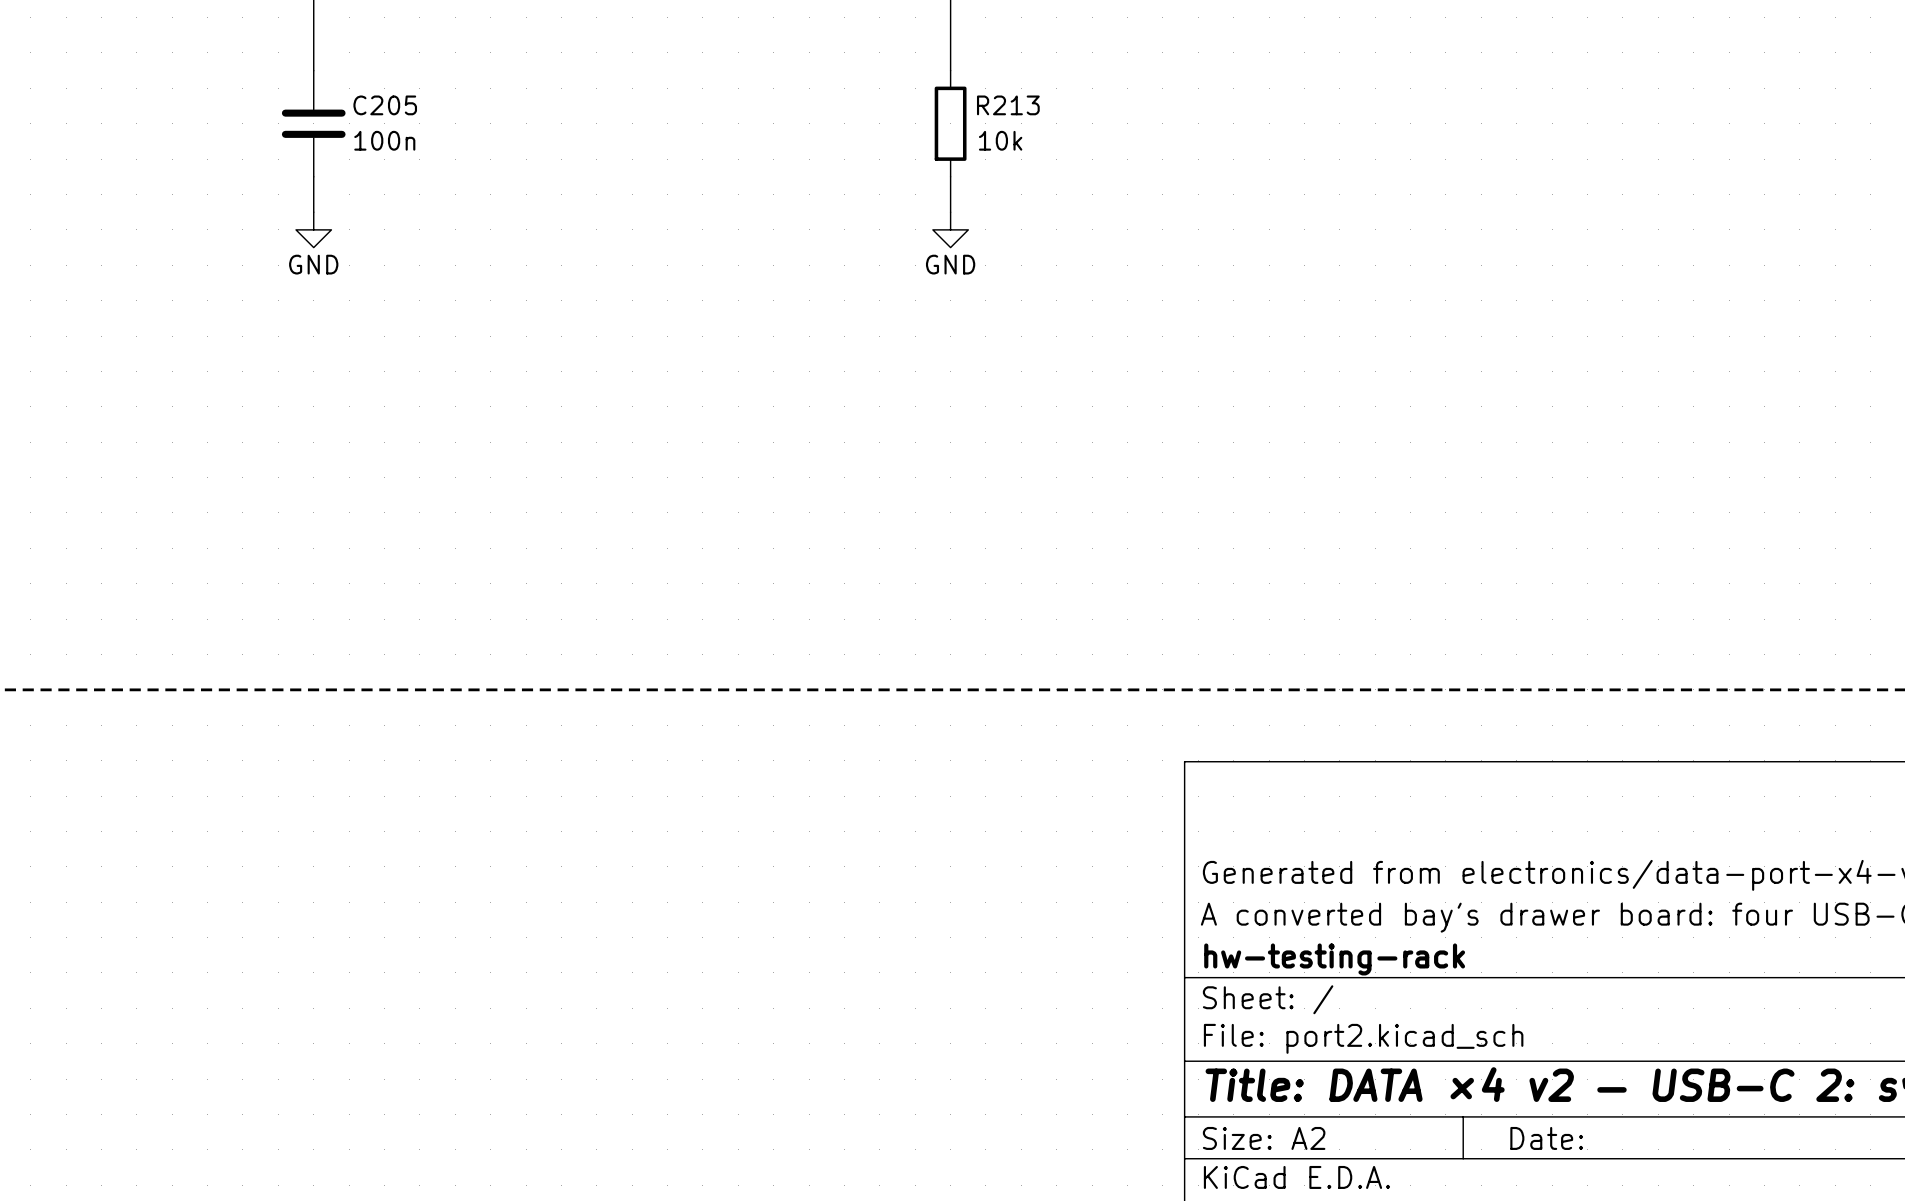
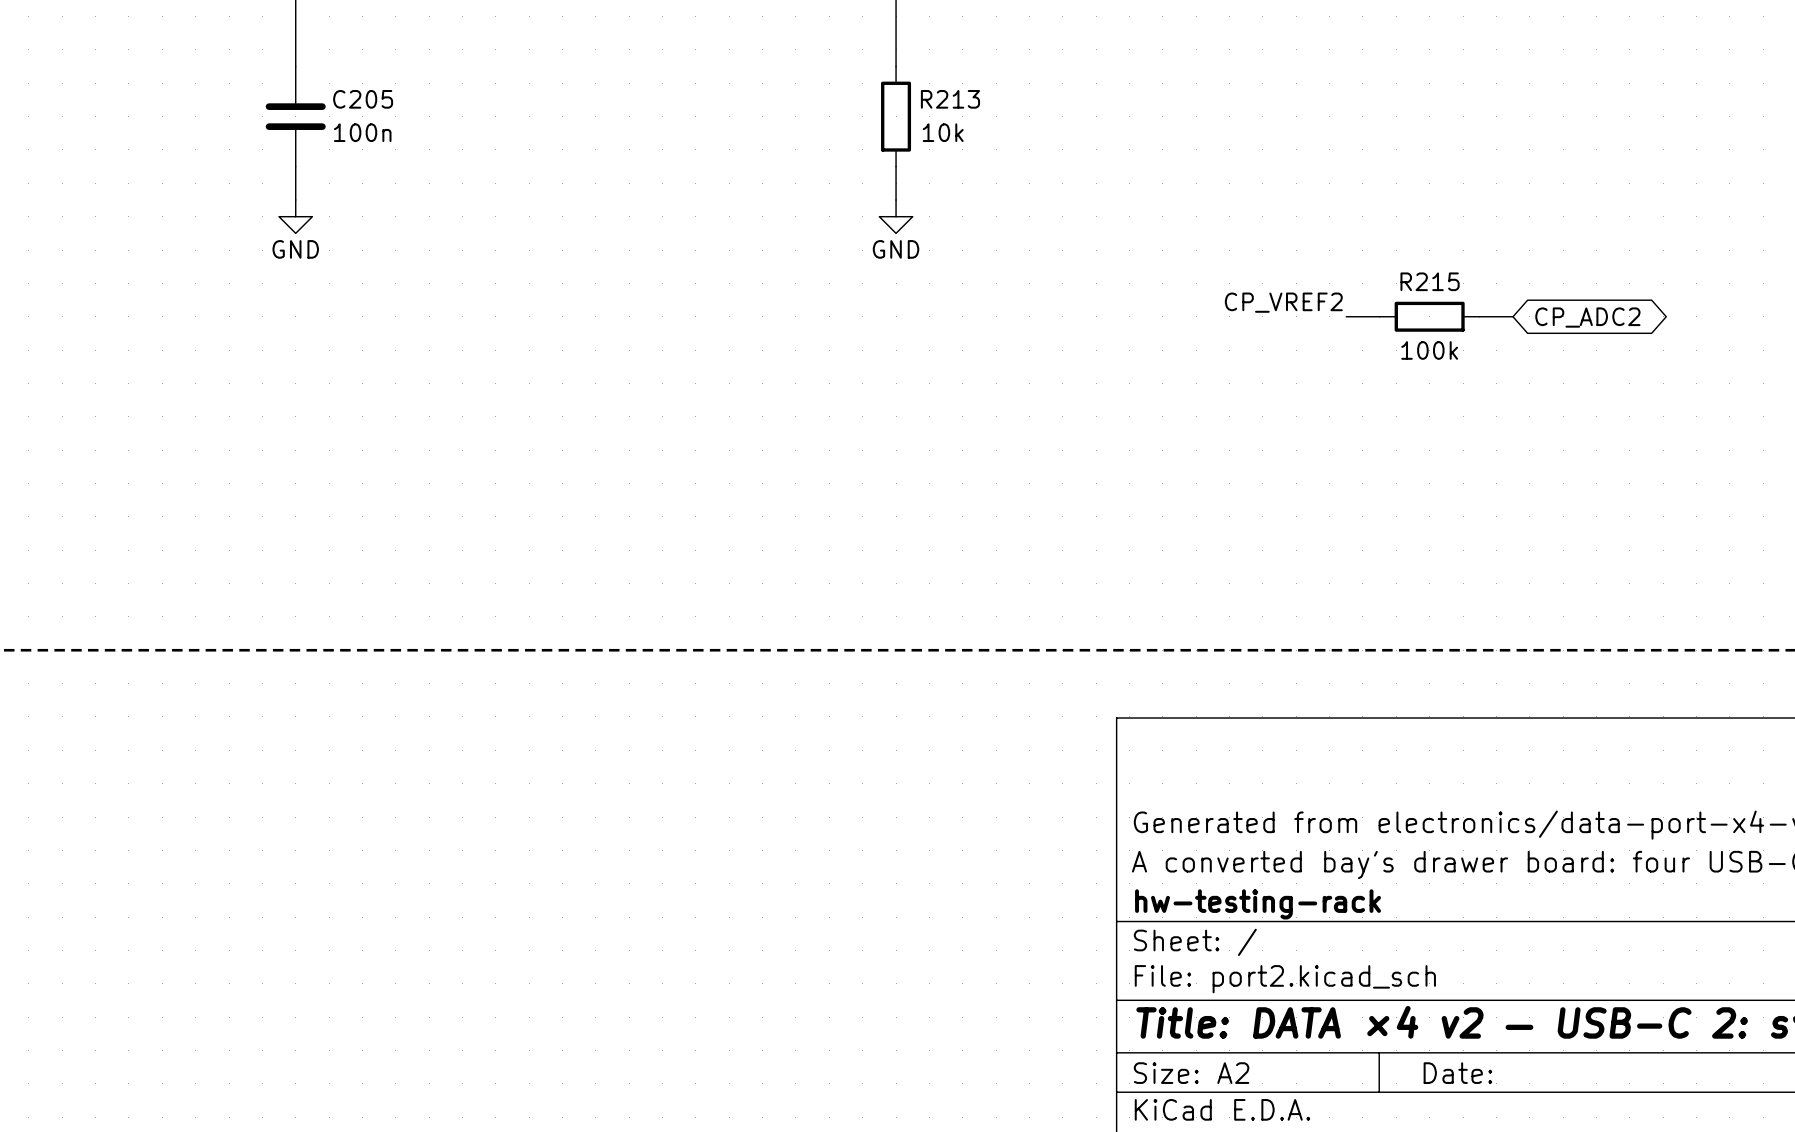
label: none -> CP_VREF2 (1283, 302)
wire: none -> (1346, 316) (1379, 316)
R215: none -> 100k (1429, 316)
wire: none -> (1479, 316) (1513, 316)
global label: none -> CP_ADC2 (1587, 317)

